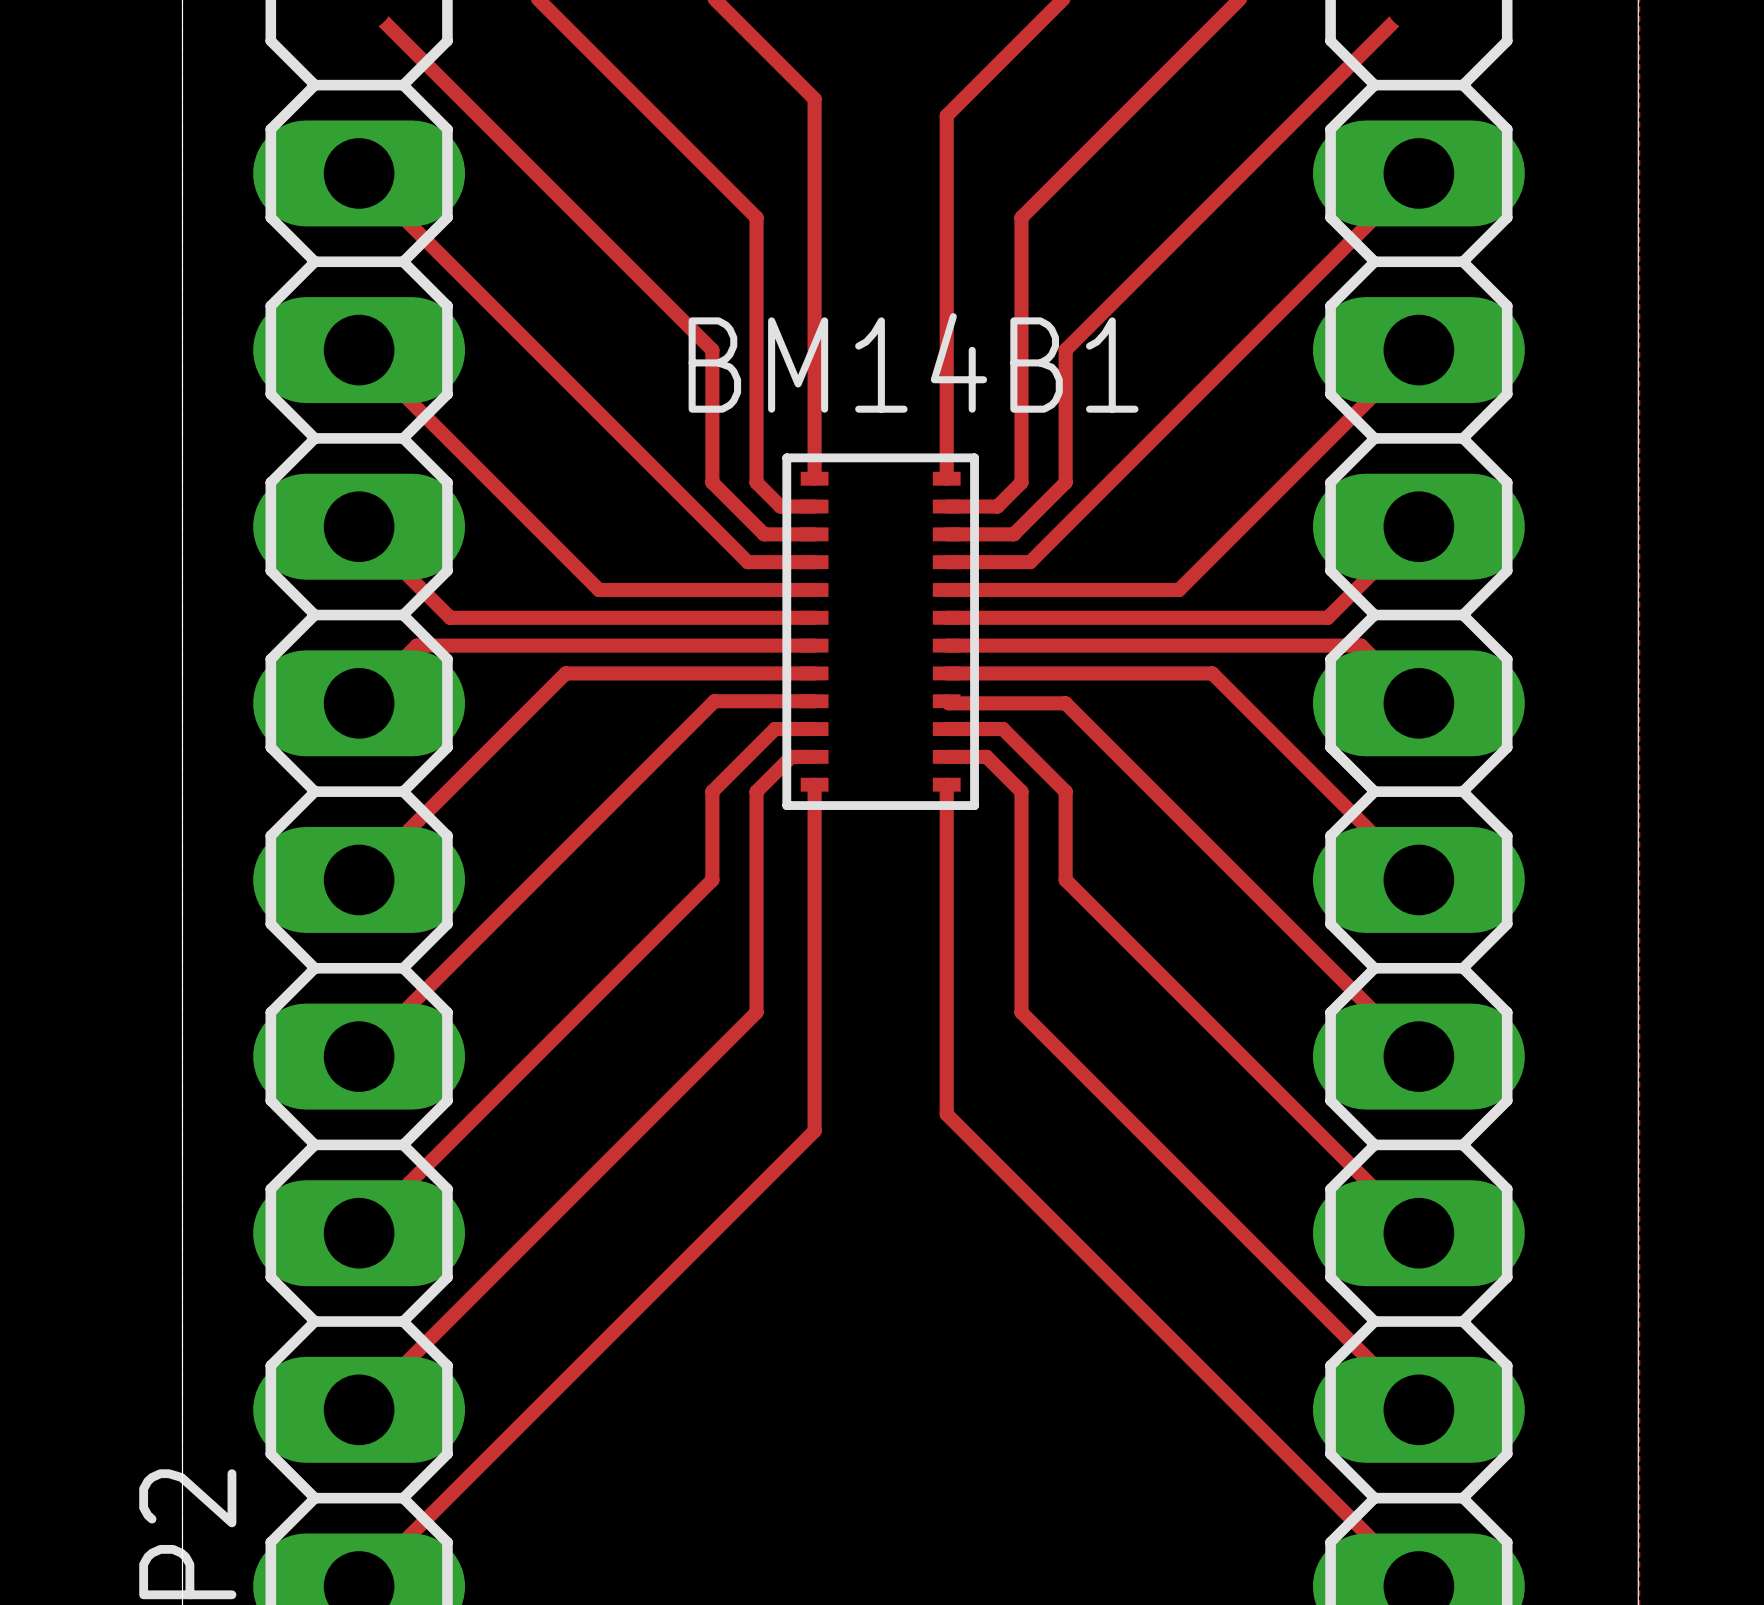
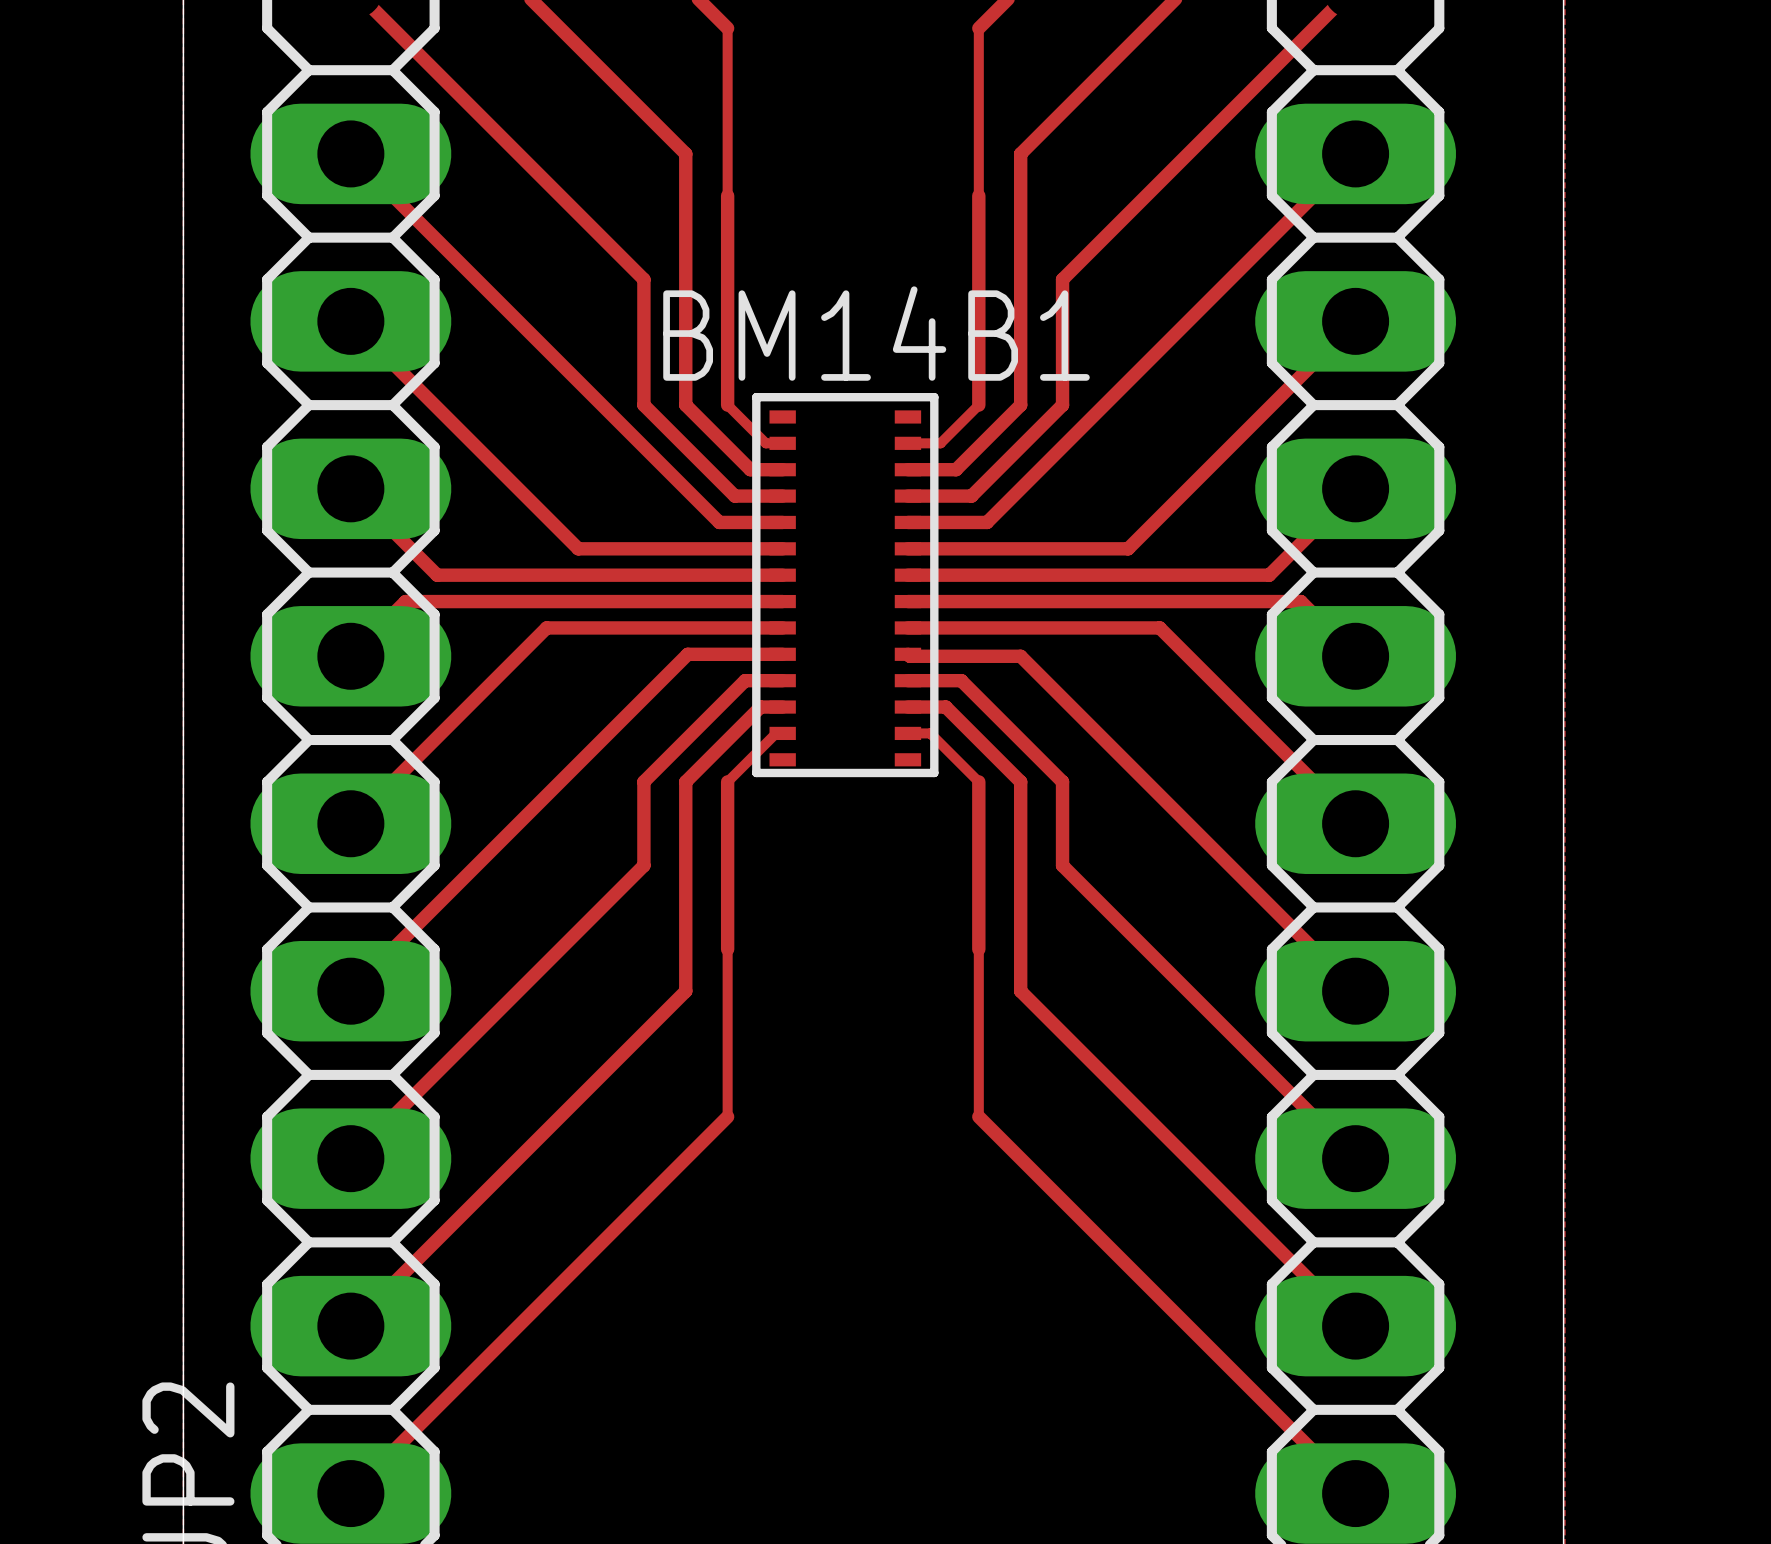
track: (756, 40) (814, 99) (814, 478) -> none
track: (1021, 40) (946, 115) (946, 478) -> (978, 405) (940, 443) (907, 443)
track: (712, 173) (756, 217) -> (727, 28) (727, 195)
track: none -> (685, 153) (685, 321)
track: (1065, 173) (1021, 217) -> (978, 28) (978, 195)
track: none -> (1020, 153) (1020, 321)
track: (668, 305) (712, 350) -> (643, 279) (643, 405) (685, 446)
track: (1109, 305) (1065, 350) -> (1062, 279) (1062, 405) (1020, 446)
track: (712, 438) (712, 482) -> (685, 405) (727, 446)
track: (756, 438) (756, 482) -> (727, 405) (765, 443) (782, 443)
track: (1021, 438) (1021, 482) -> (1020, 405) (978, 446)
track: (1065, 438) (1065, 482) -> none
BM14B1 footprint: [782, 453, 979, 810] -> [752, 393, 939, 778]
track: (814, 784) (814, 1130) (756, 1189) -> (727, 949) (727, 1116)
track: (946, 784) (946, 1114) (1021, 1189) -> (978, 949) (978, 1116)
track: none -> (907, 733) (930, 733) (978, 781)
track: (712, 791) (712, 835) -> (727, 740) (685, 781)
track: (756, 791) (756, 835) -> (782, 733) (776, 733) (727, 781)
track: (1021, 791) (1021, 835) -> (978, 740) (1020, 781)
track: (1065, 791) (1065, 835) -> none
track: (712, 879) (668, 924) -> (685, 740) (643, 781) (643, 865)
track: (1065, 879) (1109, 924) -> (1020, 740) (1062, 781) (1062, 865)
track: (756, 1012) (712, 1056) -> (685, 823) (685, 991)
track: (1021, 1012) (1065, 1056) -> (1020, 823) (1020, 991)

